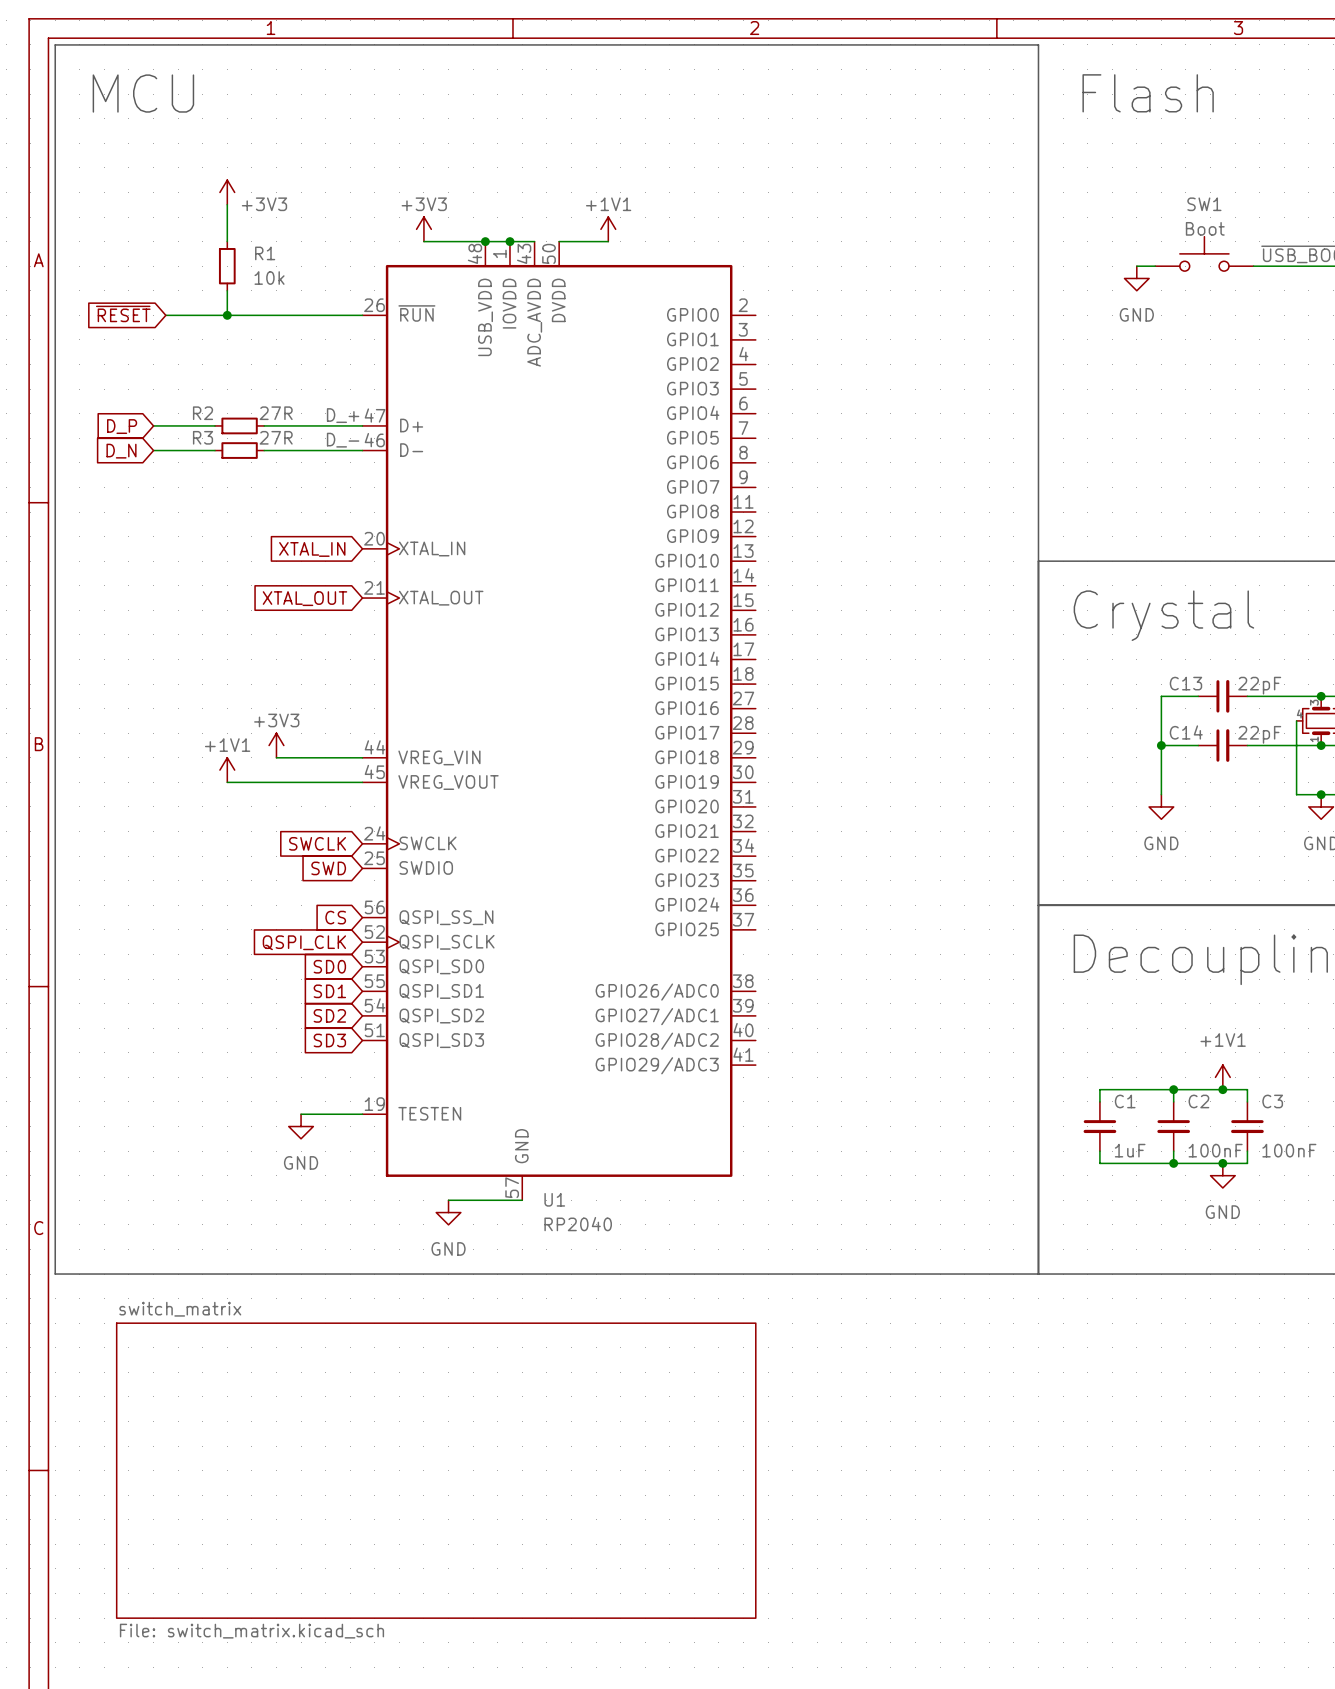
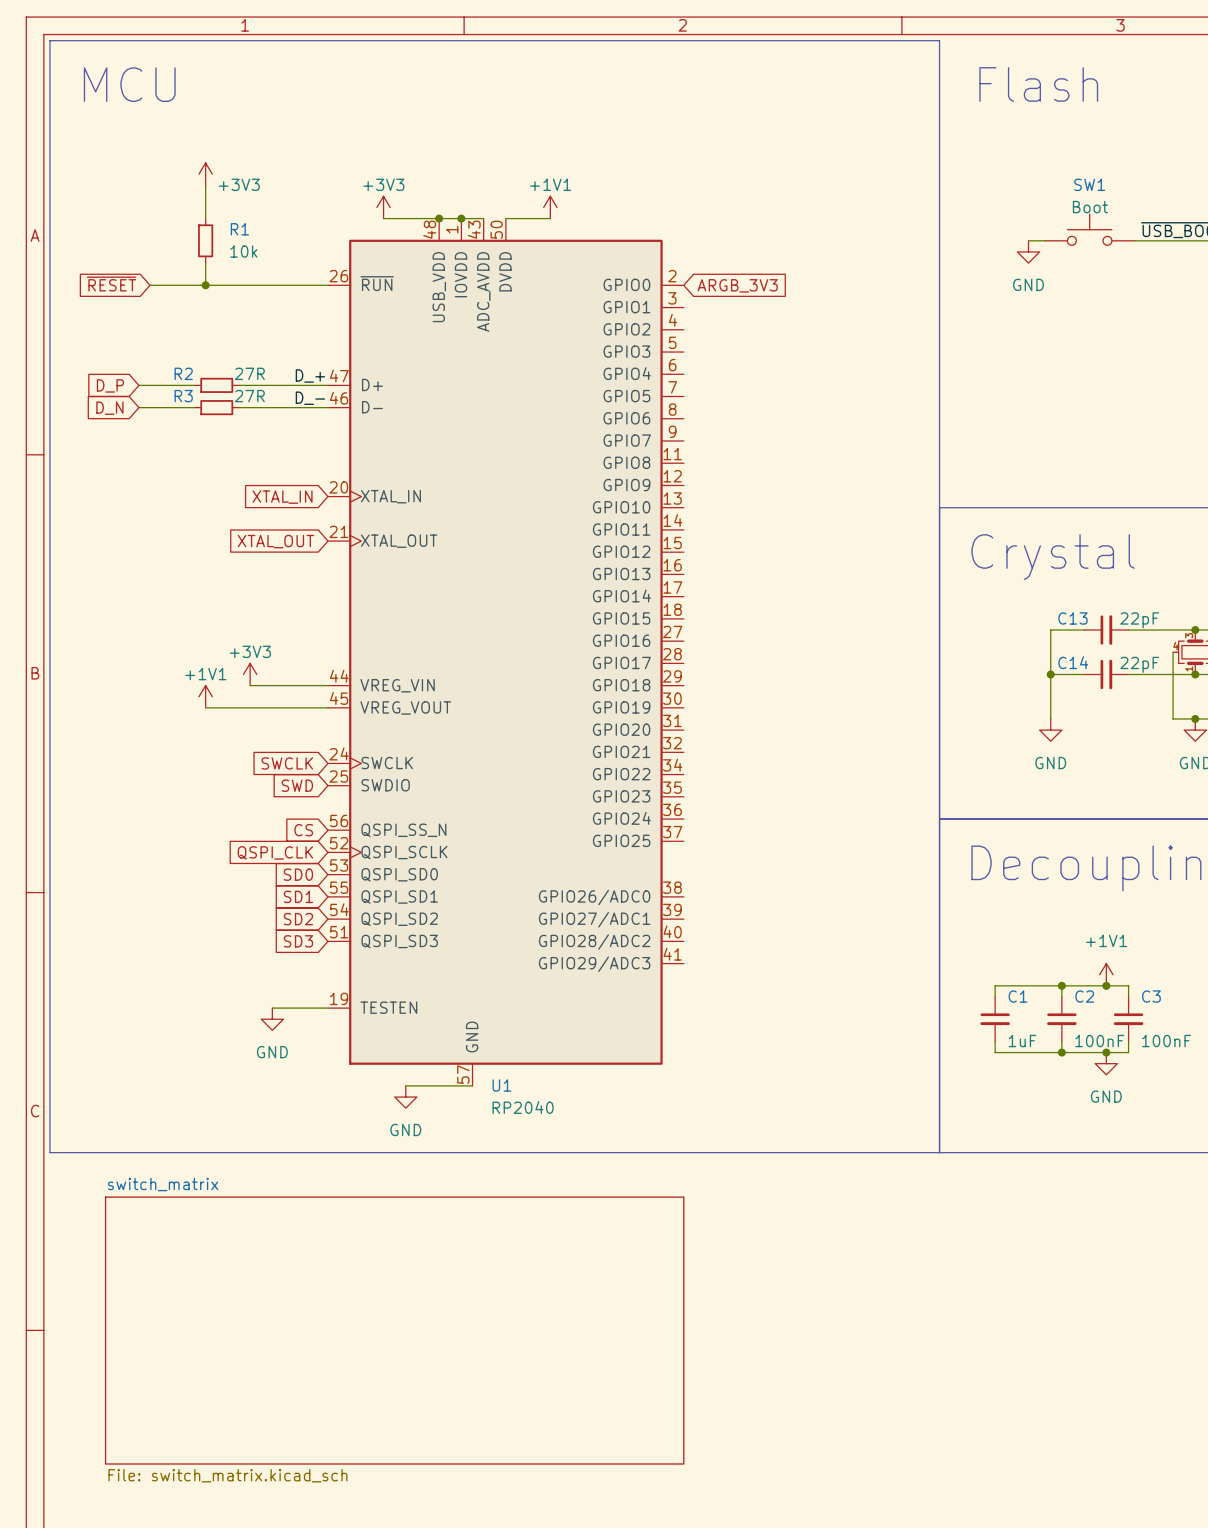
global label: none -> ARGB_3V3 (737, 285)

